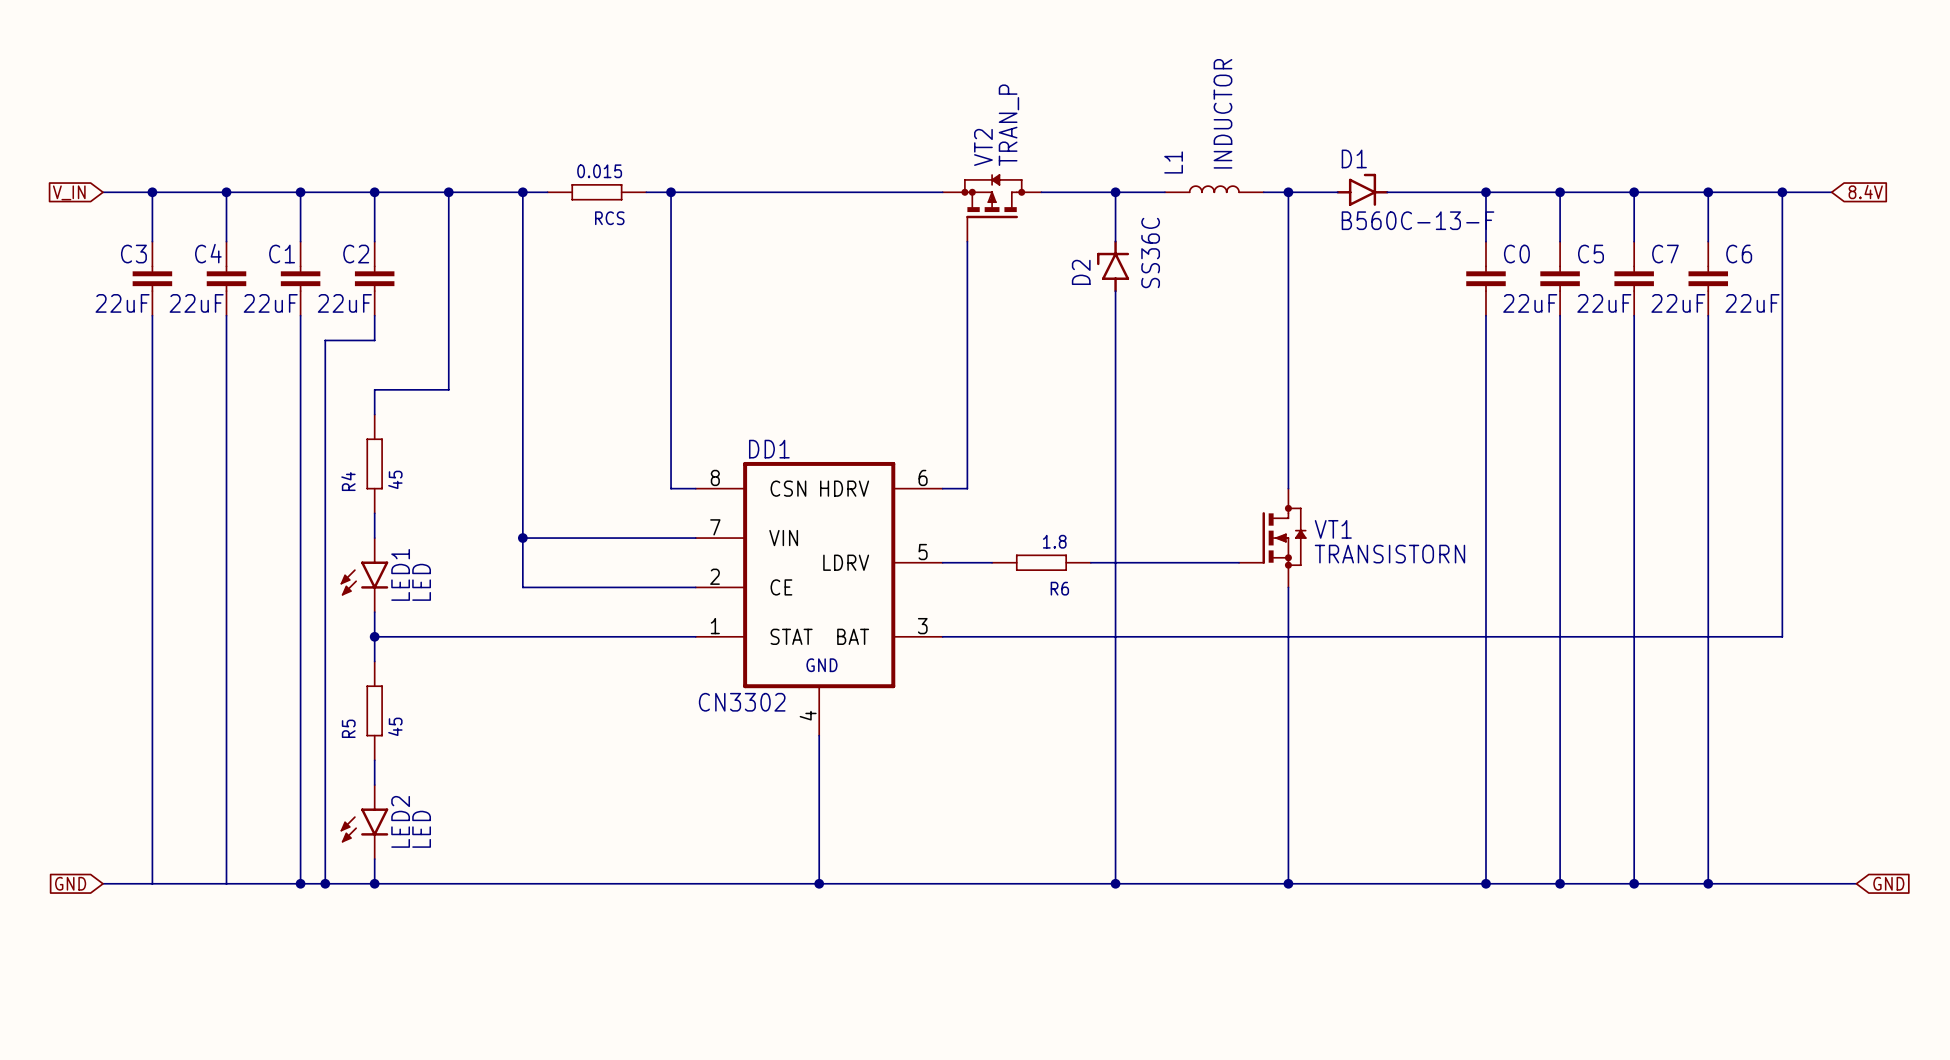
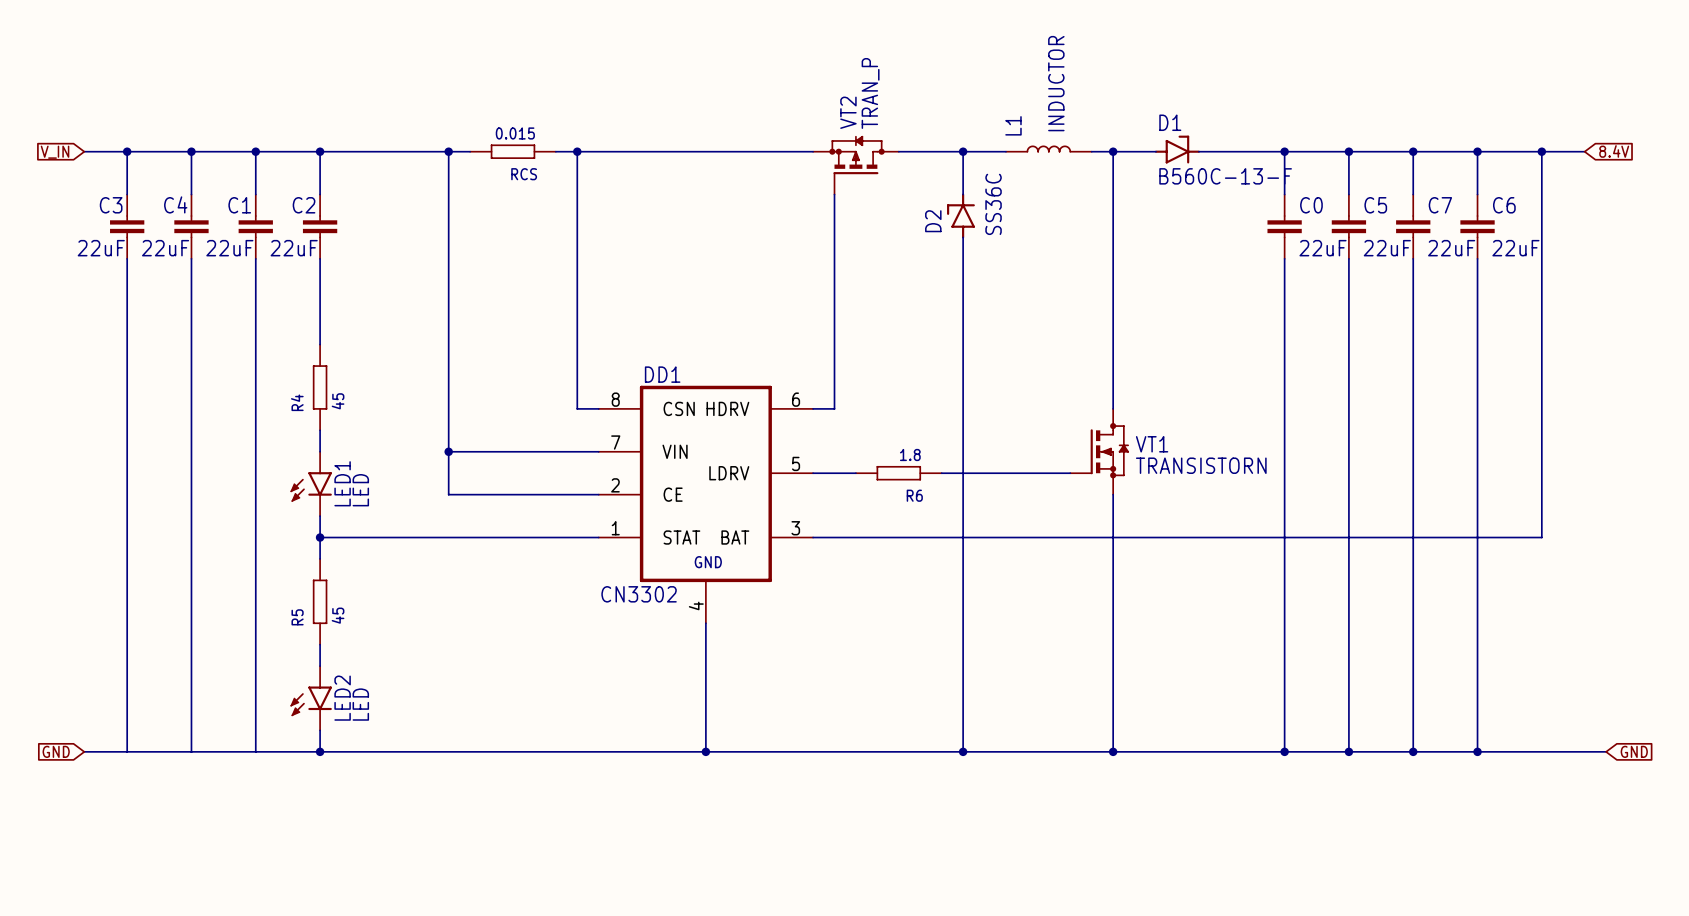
wire: (448, 192) (448, 389) (374, 389) -> (320, 280) (320, 323)
junction: (448, 192) -> none
wire: (374, 340) (325, 340) (325, 883) -> none
junction: (300, 883) -> none
junction: (325, 883) -> none

